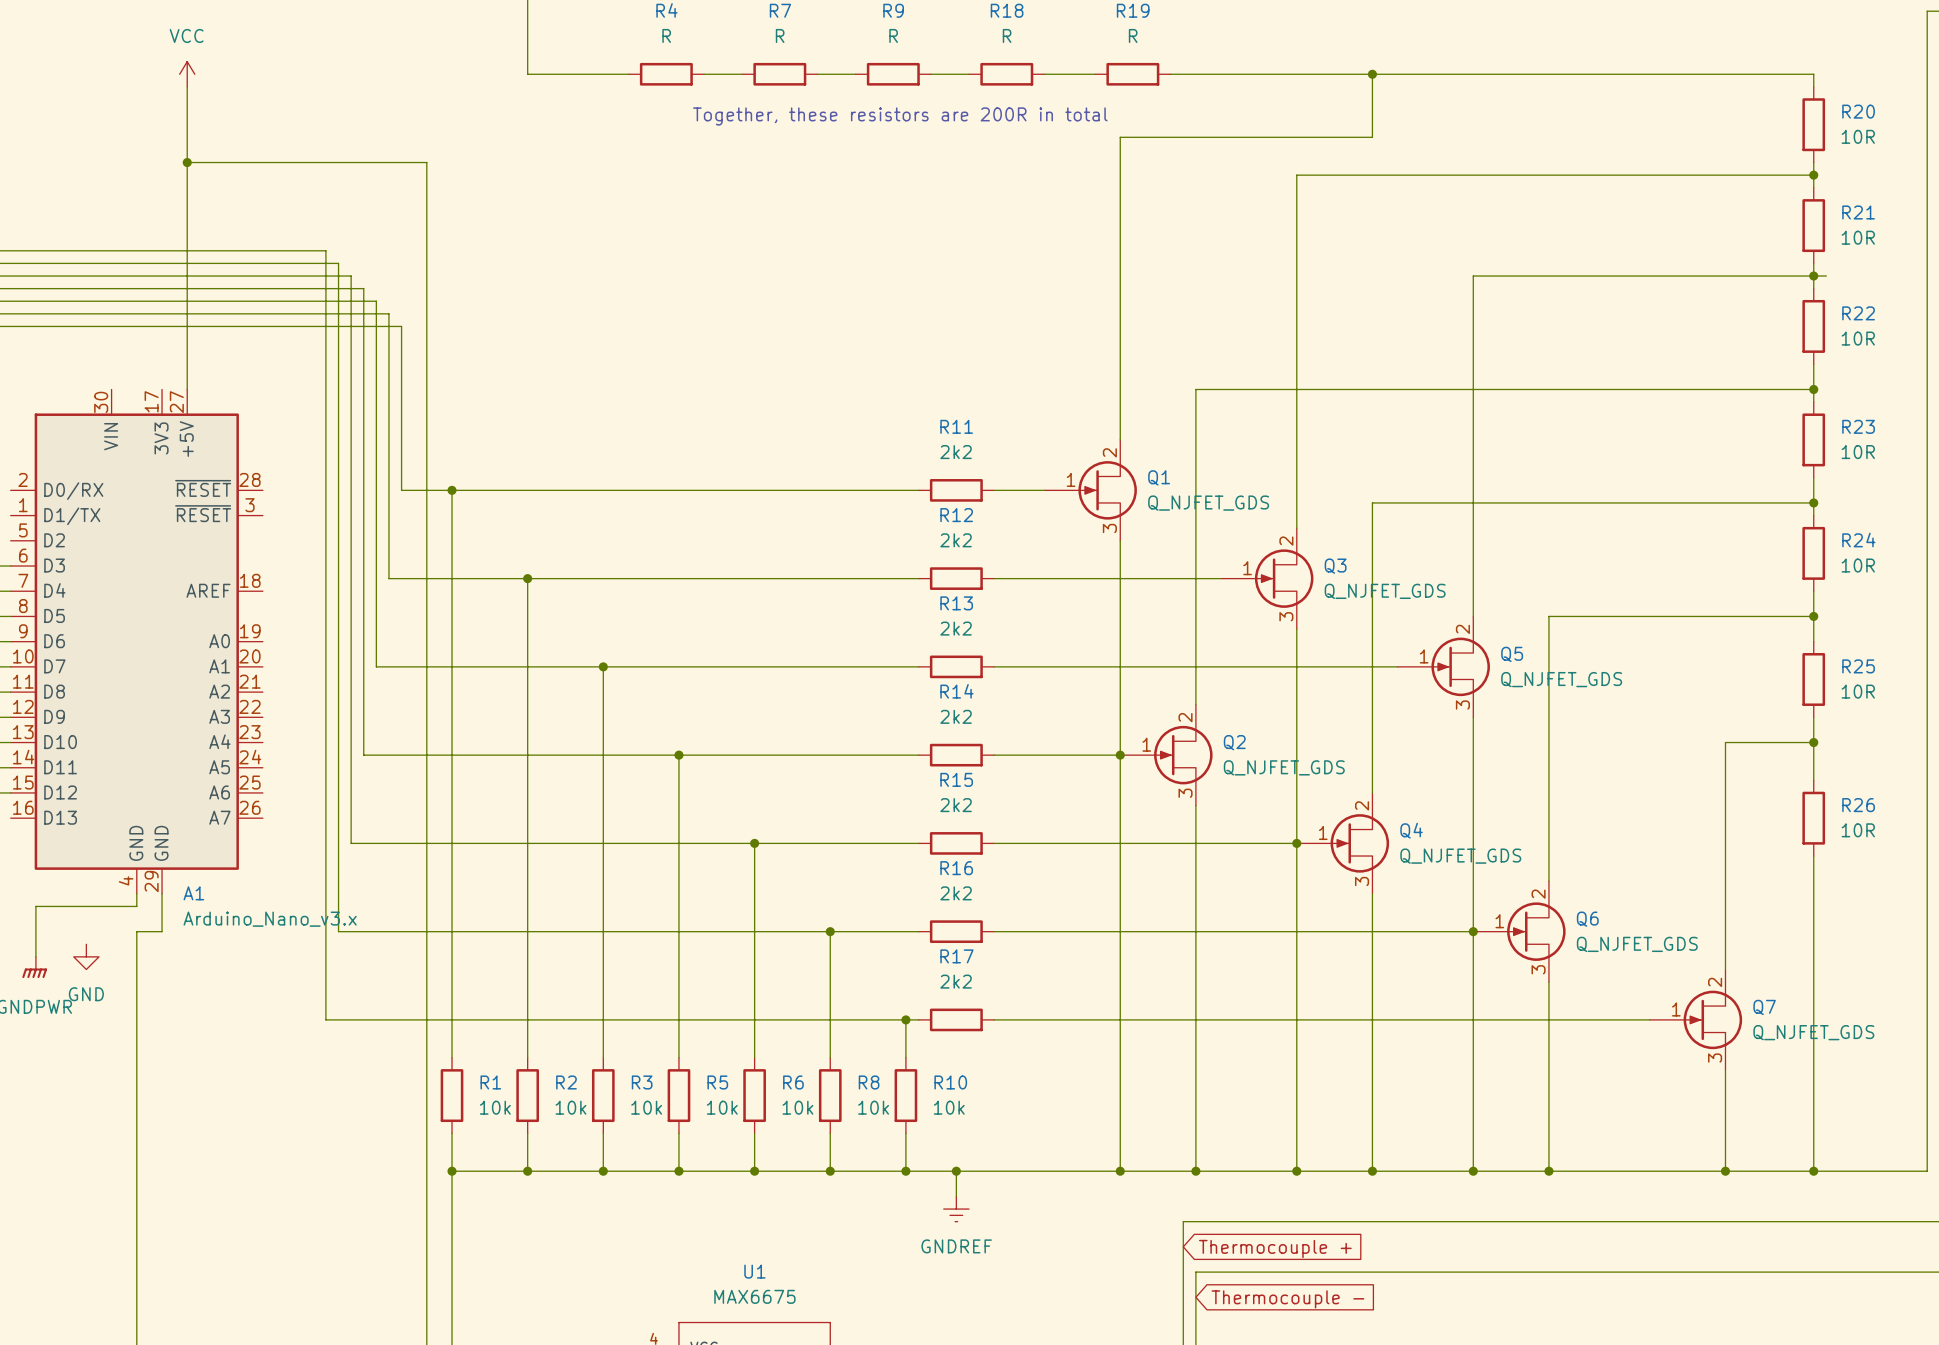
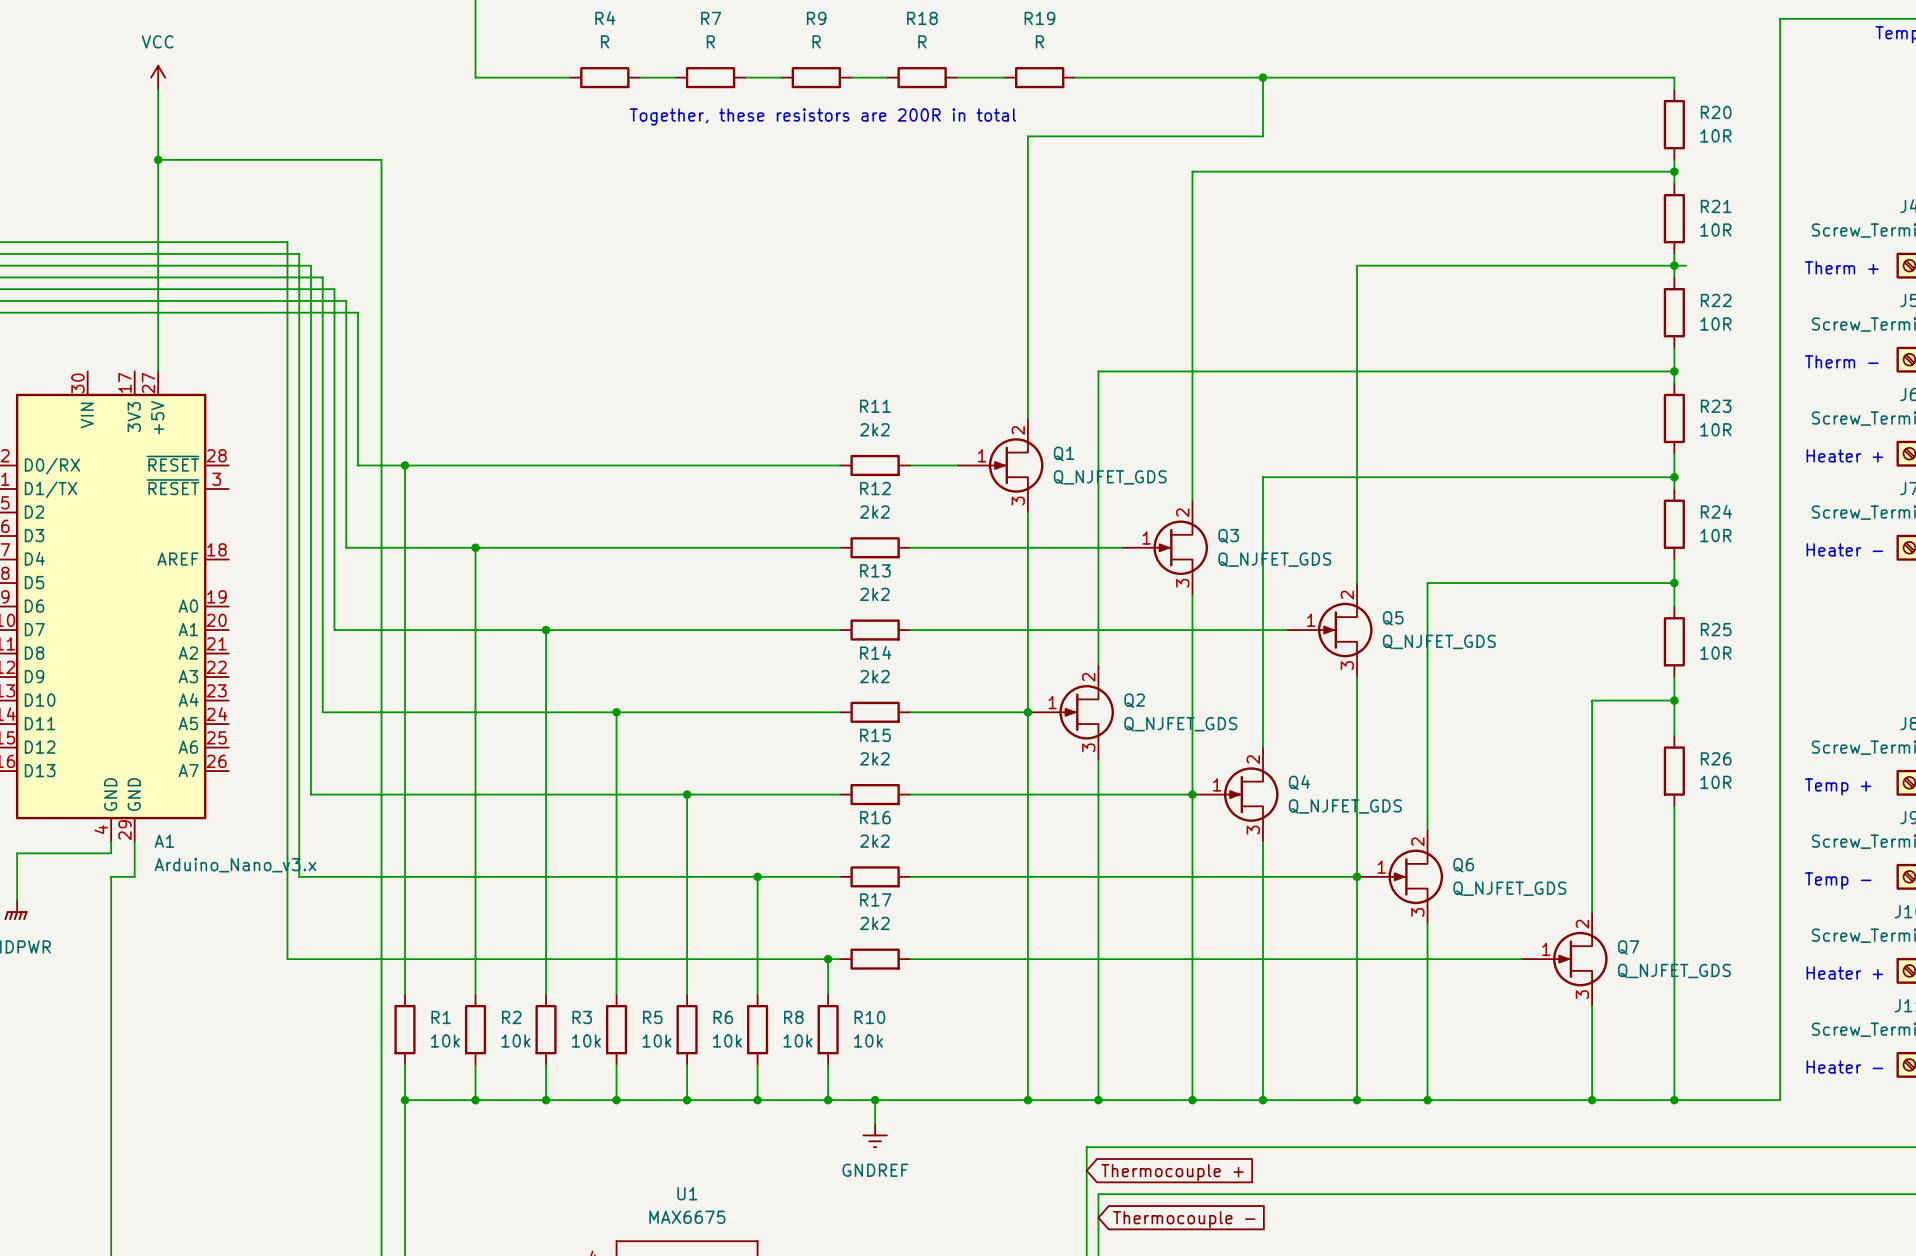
power symbol: GND (86, 956) -> none

